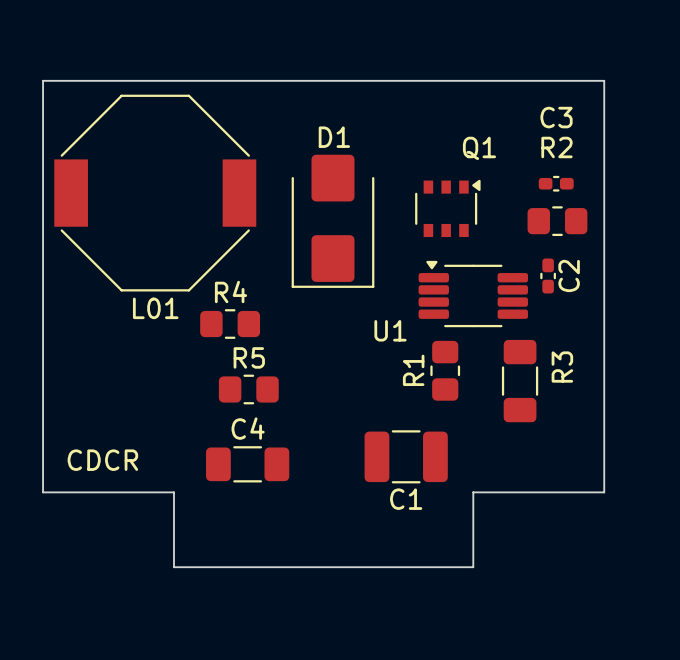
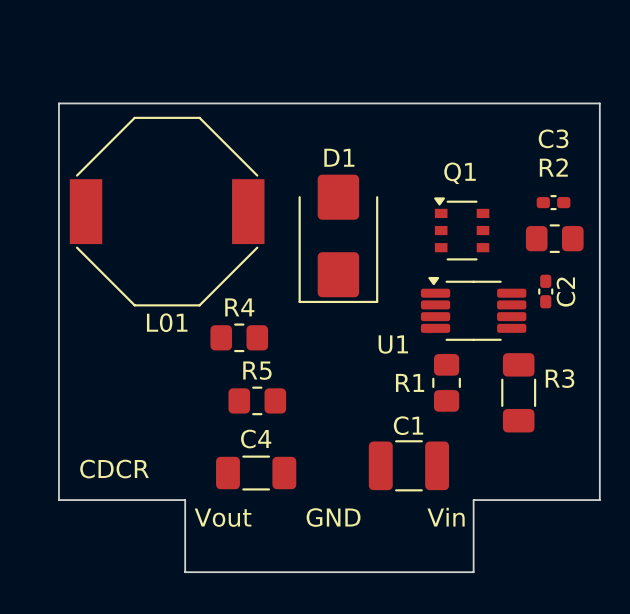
Q1 rotation: 0° (447, 208) -> 90° counterclockwise (461, 228)
R3 name rotation: 0° (562, 367) -> 90° clockwise (560, 378)
R1 name rotation: 0° (413, 370) -> 90° clockwise (410, 382)
C1 name position: C1 (406, 499) -> C1 (408, 425)
text: none -> Vout (223, 517)
text: none -> GND (333, 517)
text: none -> Vin (446, 517)

